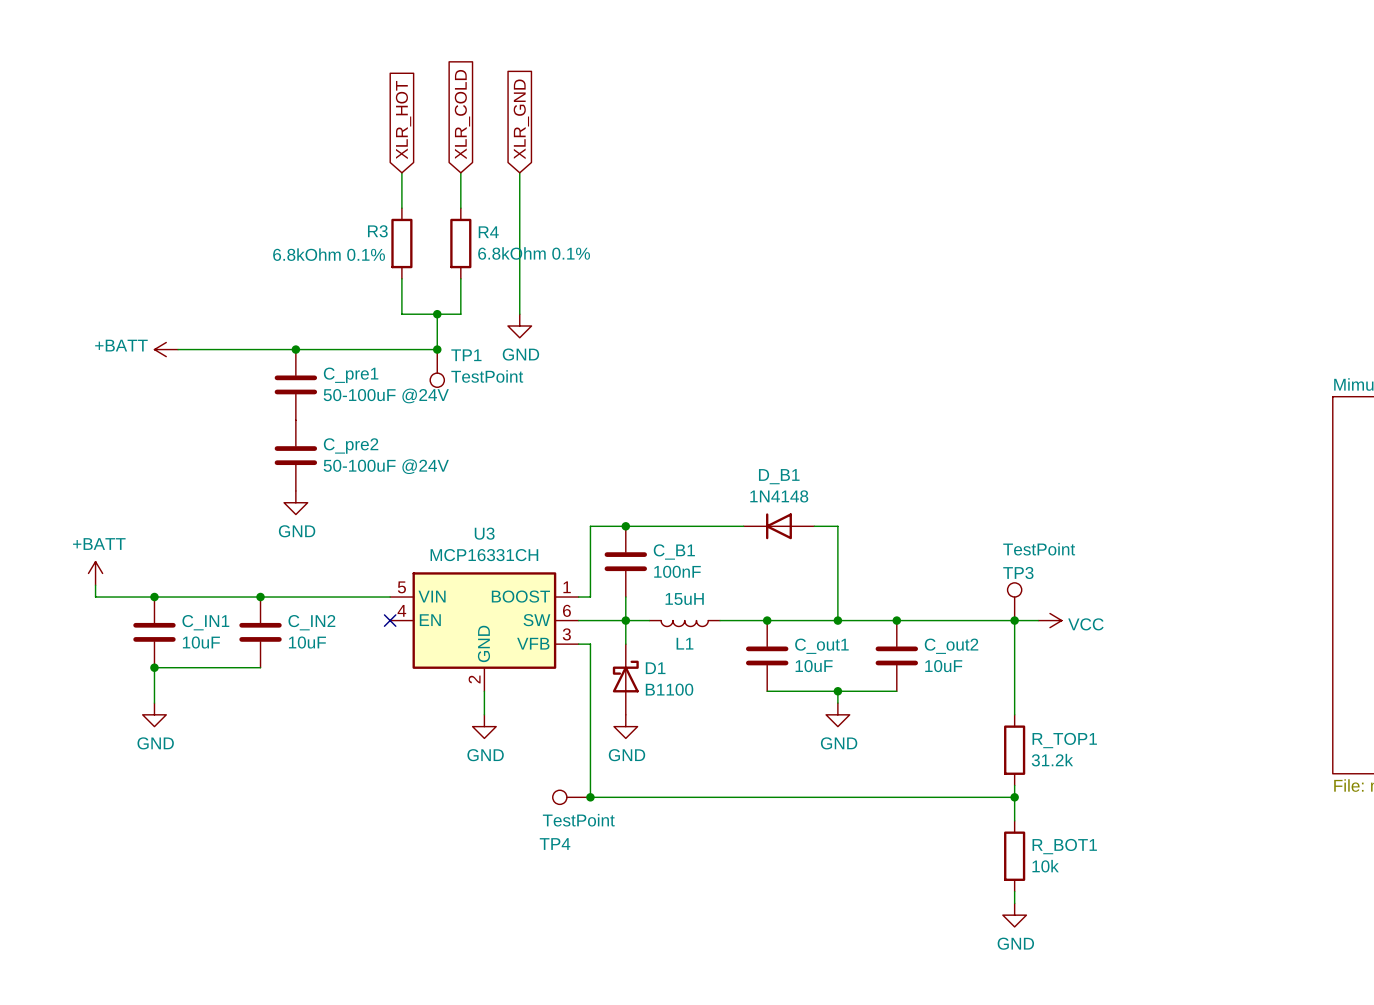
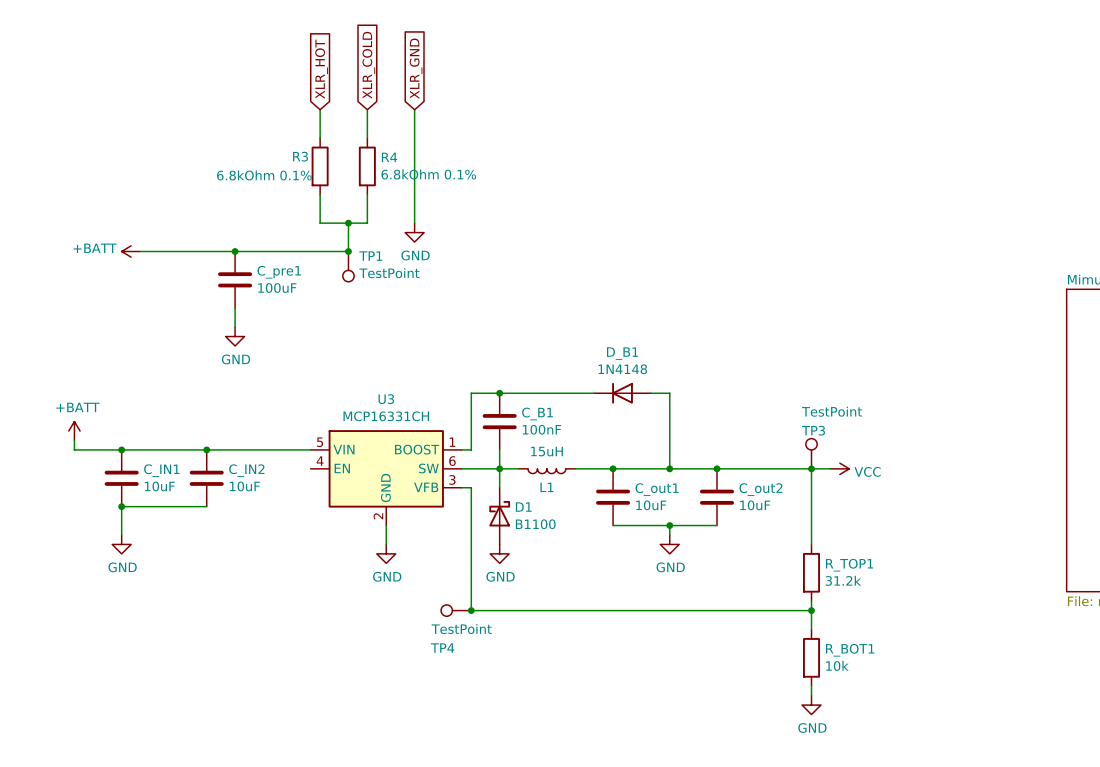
C_pre1 value: 50-100uF @24V (386, 395) -> 100uF (277, 288)
C_pre2: 50-100uF @24V (295, 455) -> none
power symbol position: GND (295, 502) -> GND (235, 336)
no-connect mark: (390, 620) -> none

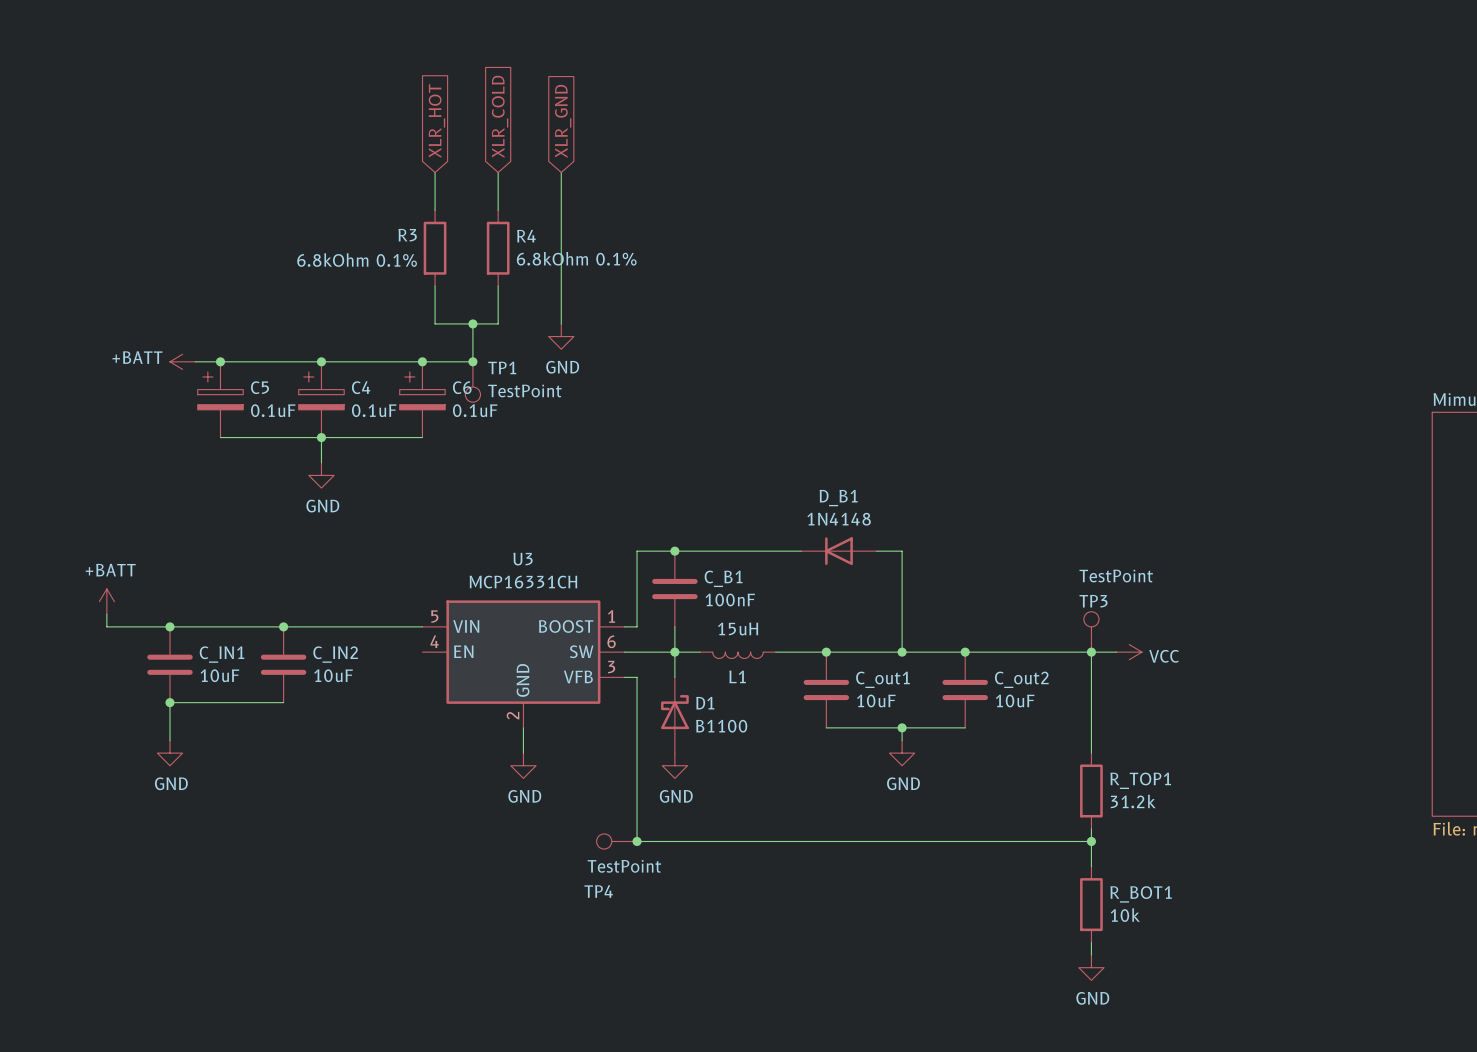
junction: none -> (220, 361)
junction: none -> (422, 361)
C5: none -> 0.1uF (220, 399)
C_pre1: 100uF (235, 279) -> none
C4: none -> 0.1uF (321, 399)
C6: none -> 0.1uF (422, 399)
wire: none -> (220, 437) (422, 437)
junction: none -> (321, 437)

